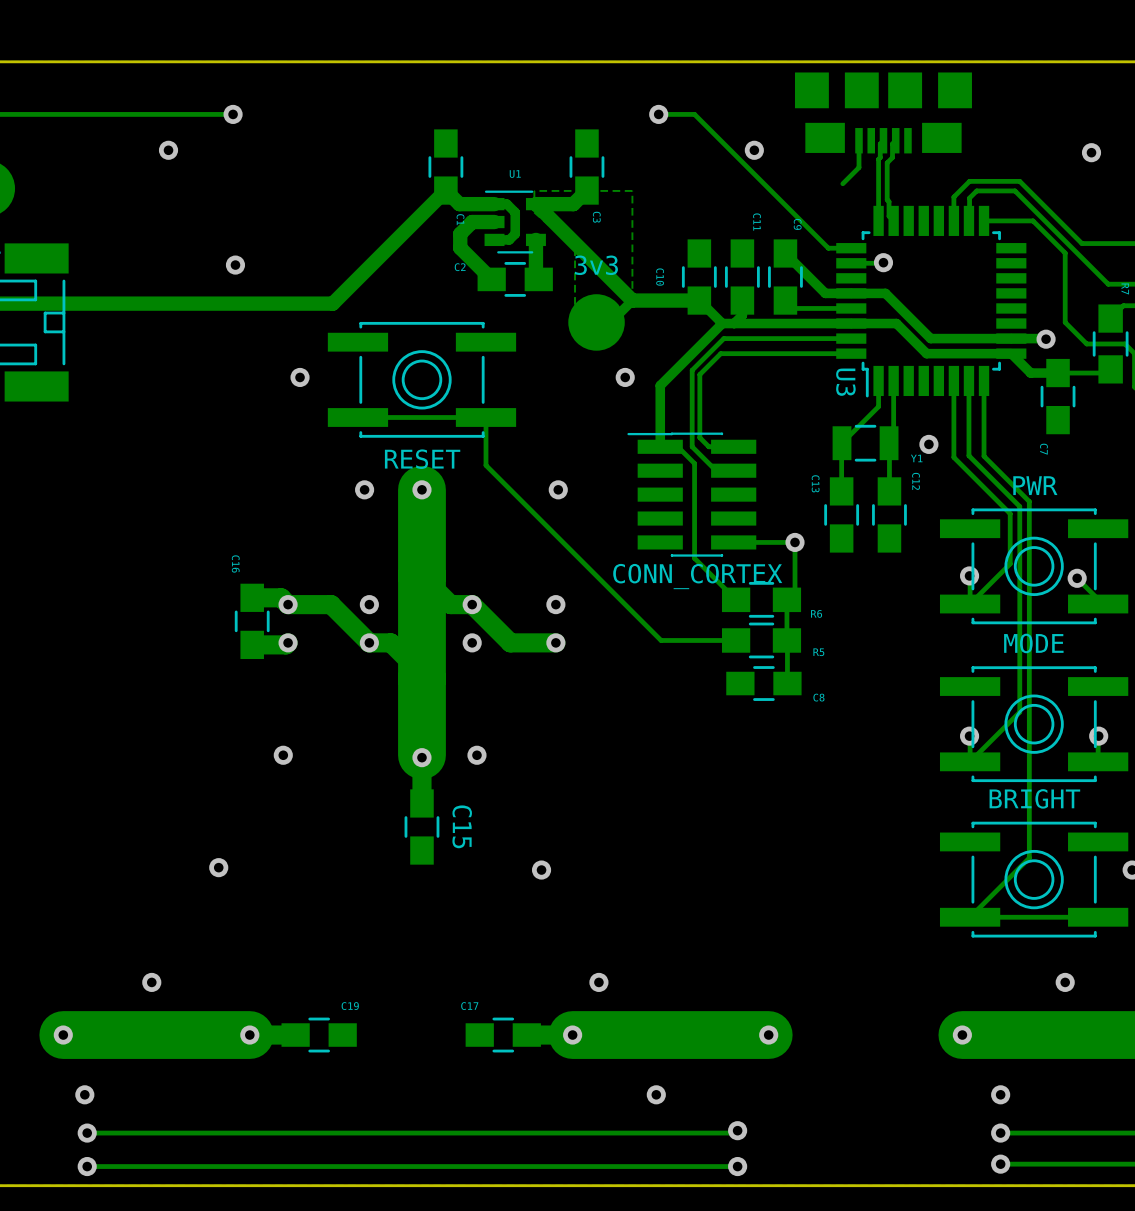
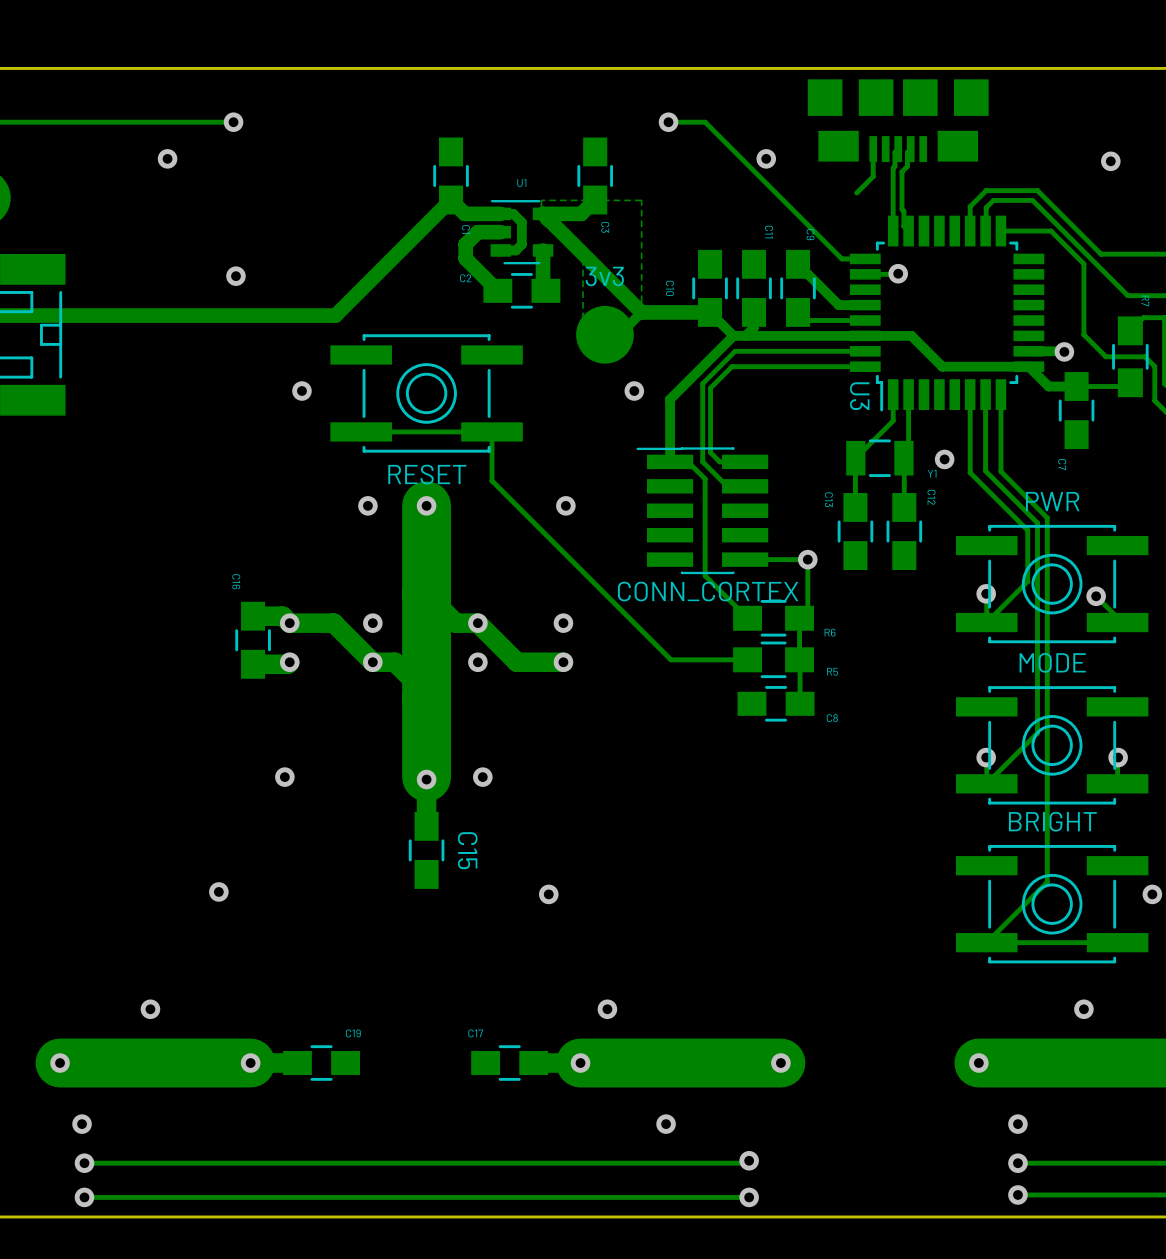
track: (851, 293) (885, 293) (930, 338) (1011, 338) -> none

